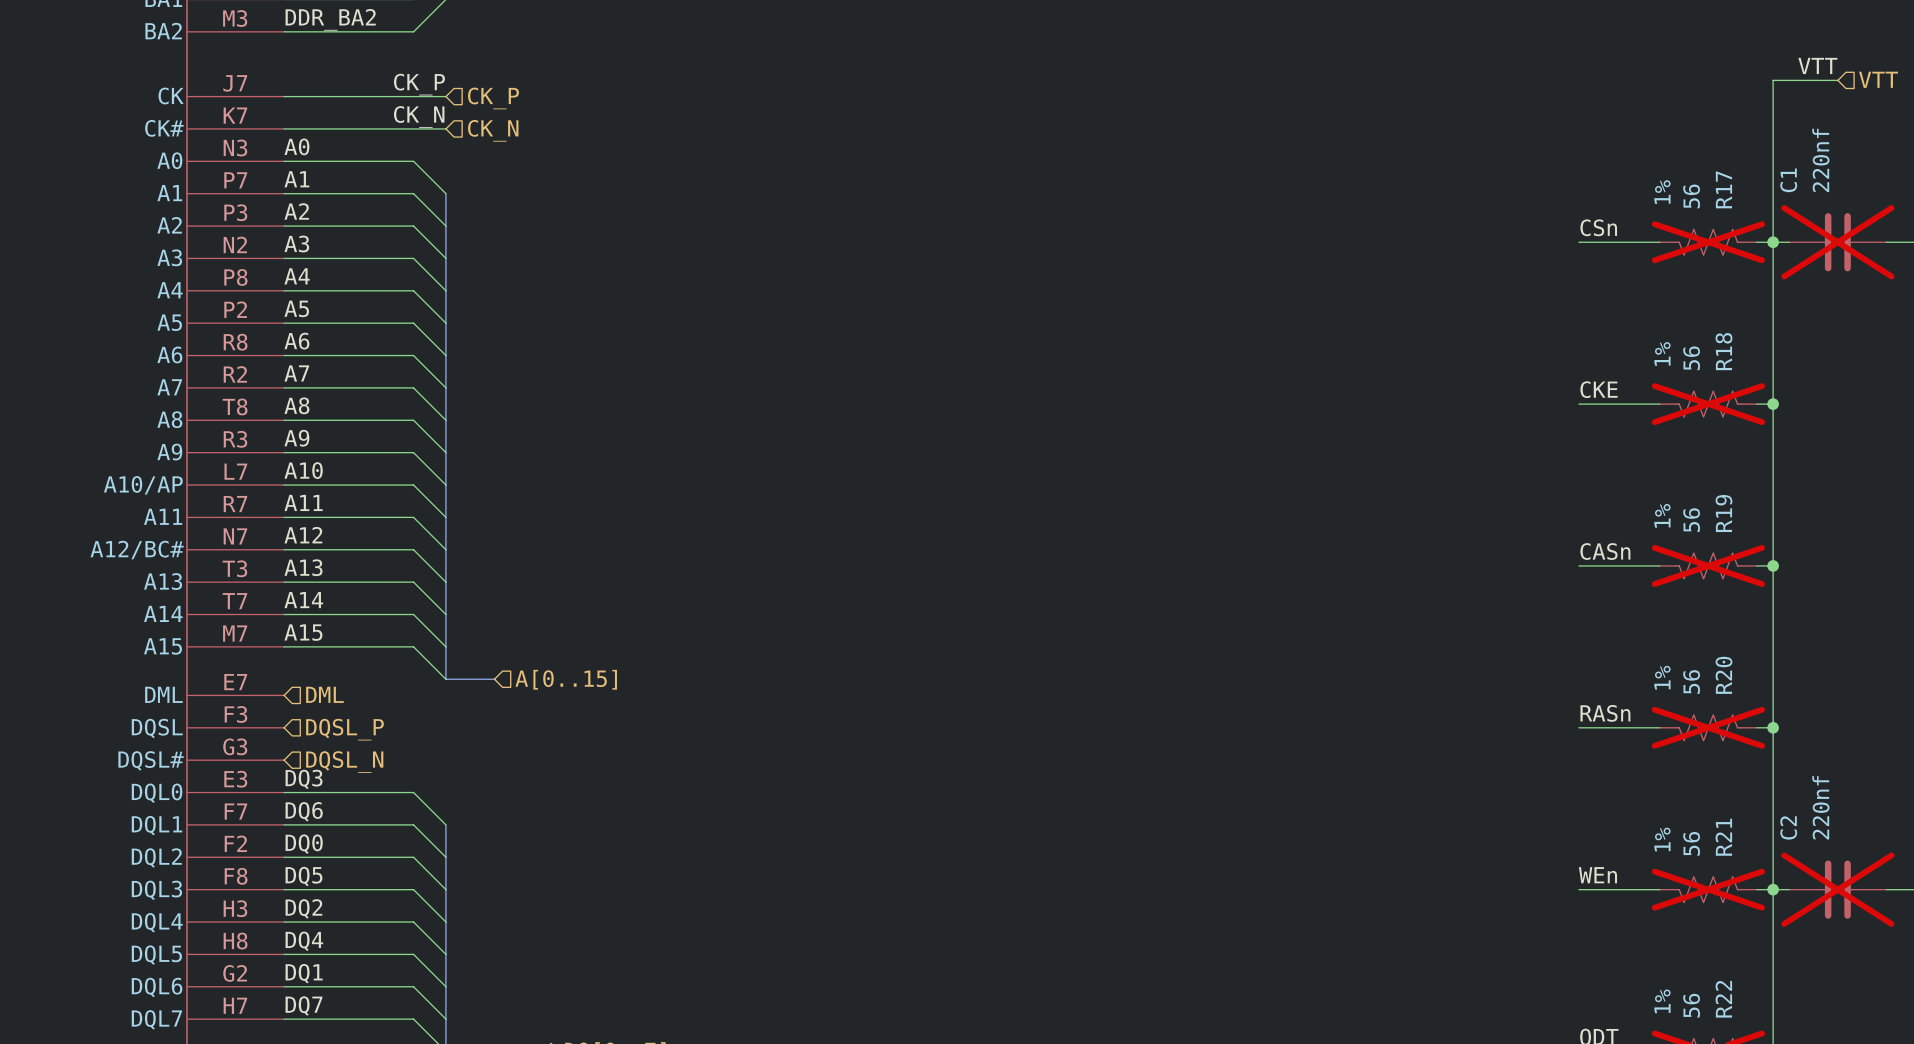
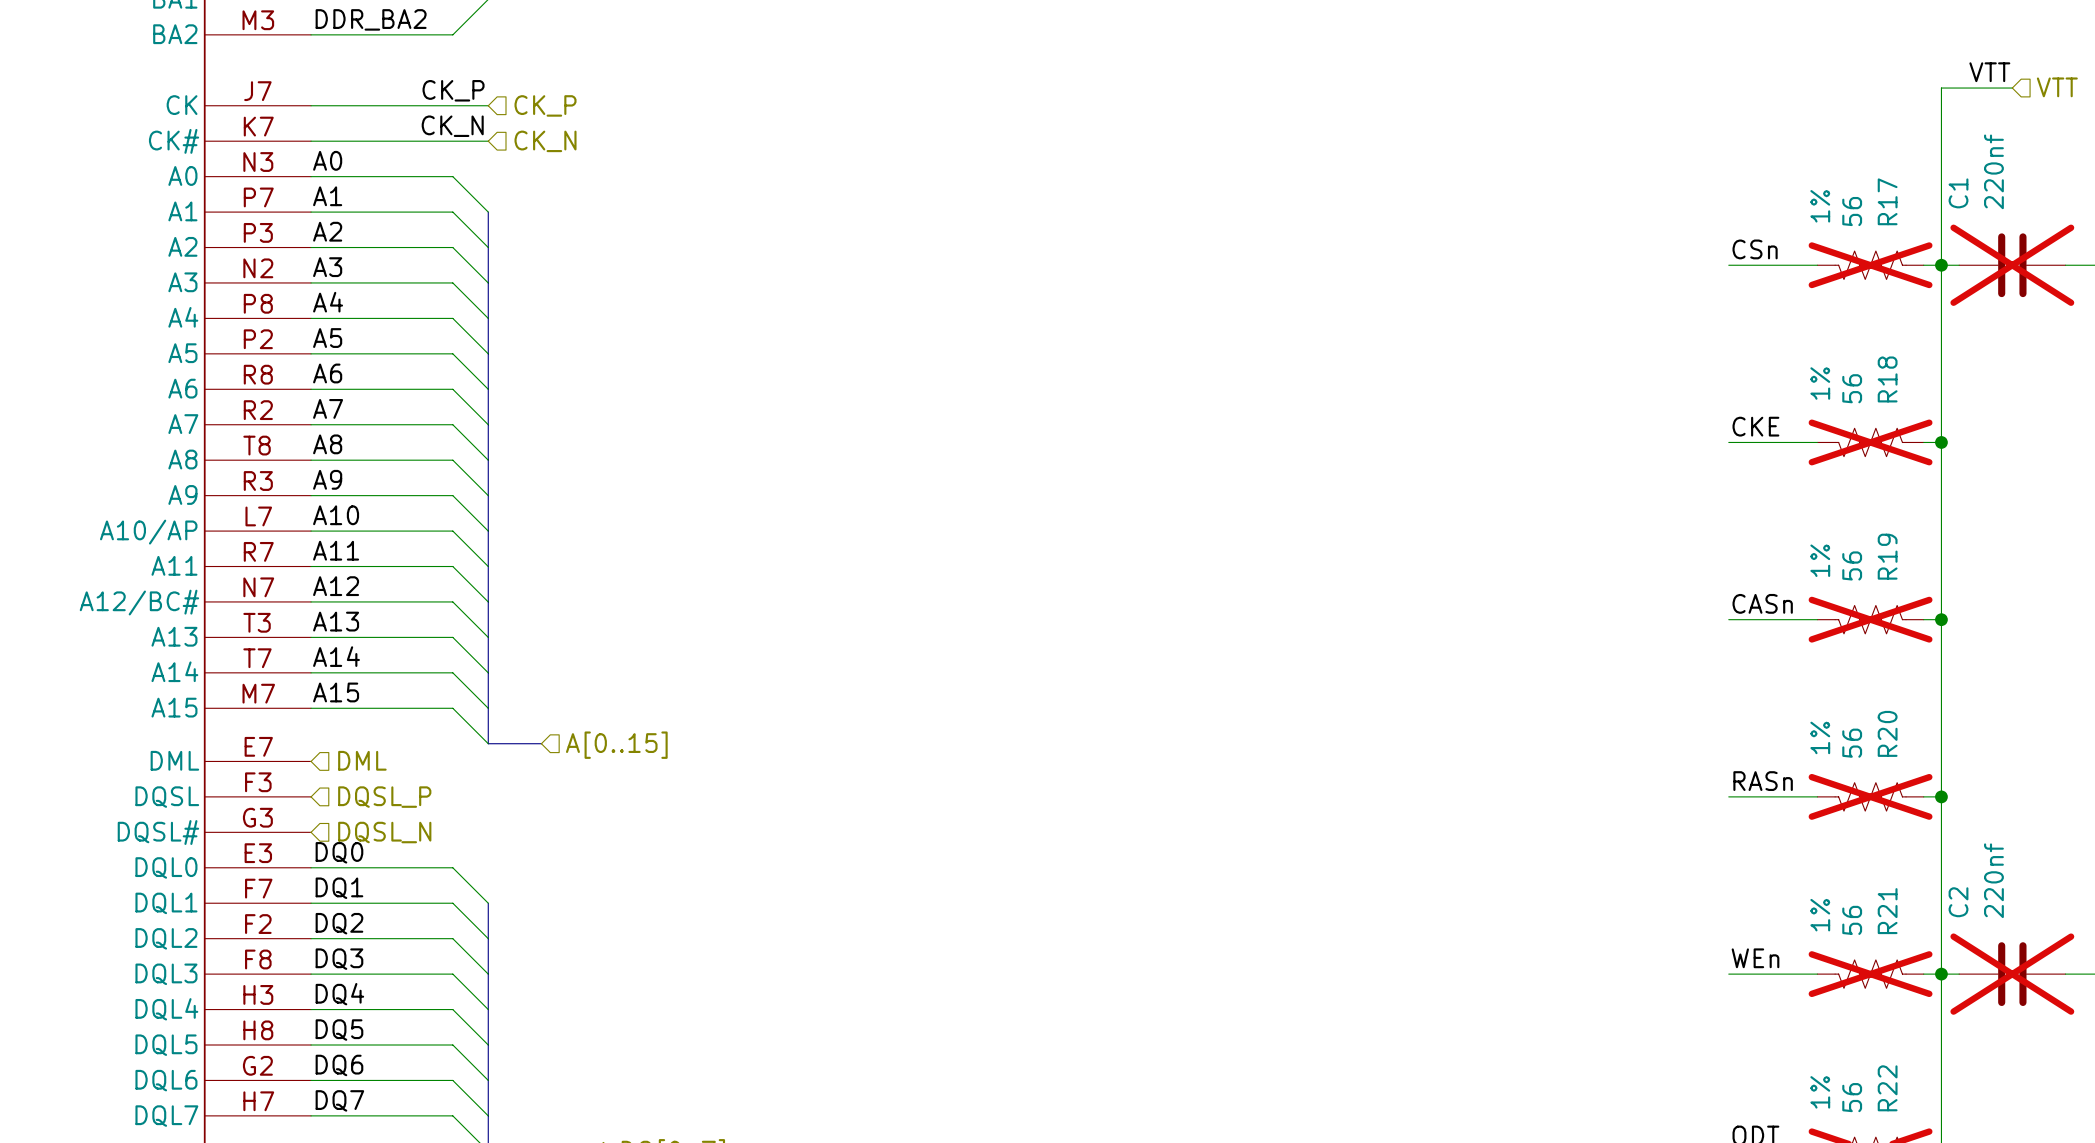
label: DQ3 (304, 779) -> DQ0 (339, 852)
label: DQ6 (304, 811) -> DQ1 (339, 888)
label: DQ0 (304, 844) -> DQ2 (339, 923)
label: DQ5 (303, 876) -> DQ3 (339, 959)
label: DQ2 (303, 908) -> DQ4 (339, 994)
label: DQ4 (304, 941) -> DQ5 (339, 1030)
label: DQ1 (304, 973) -> DQ6 (339, 1065)

